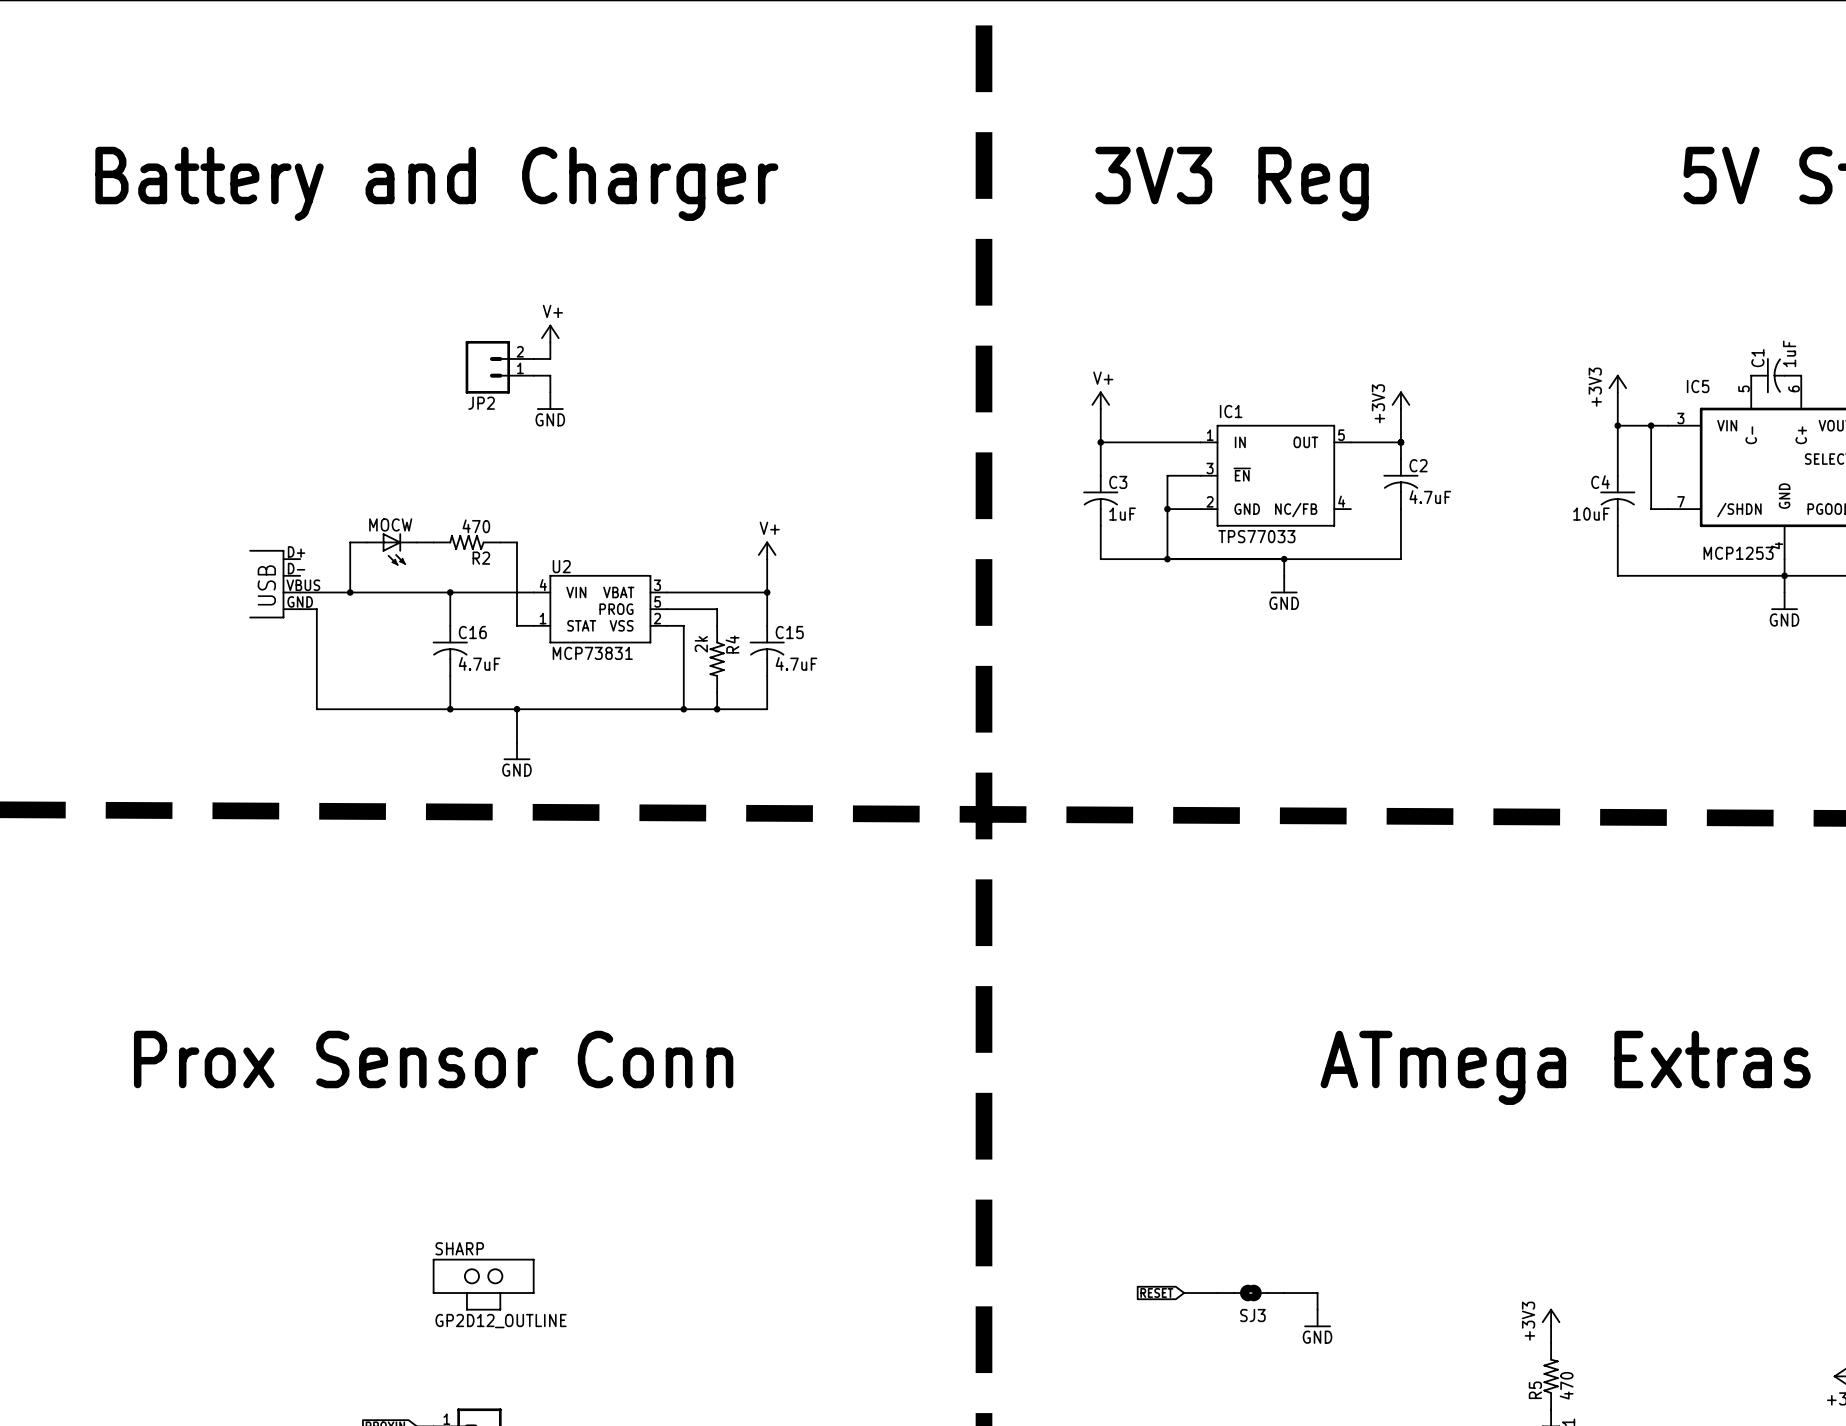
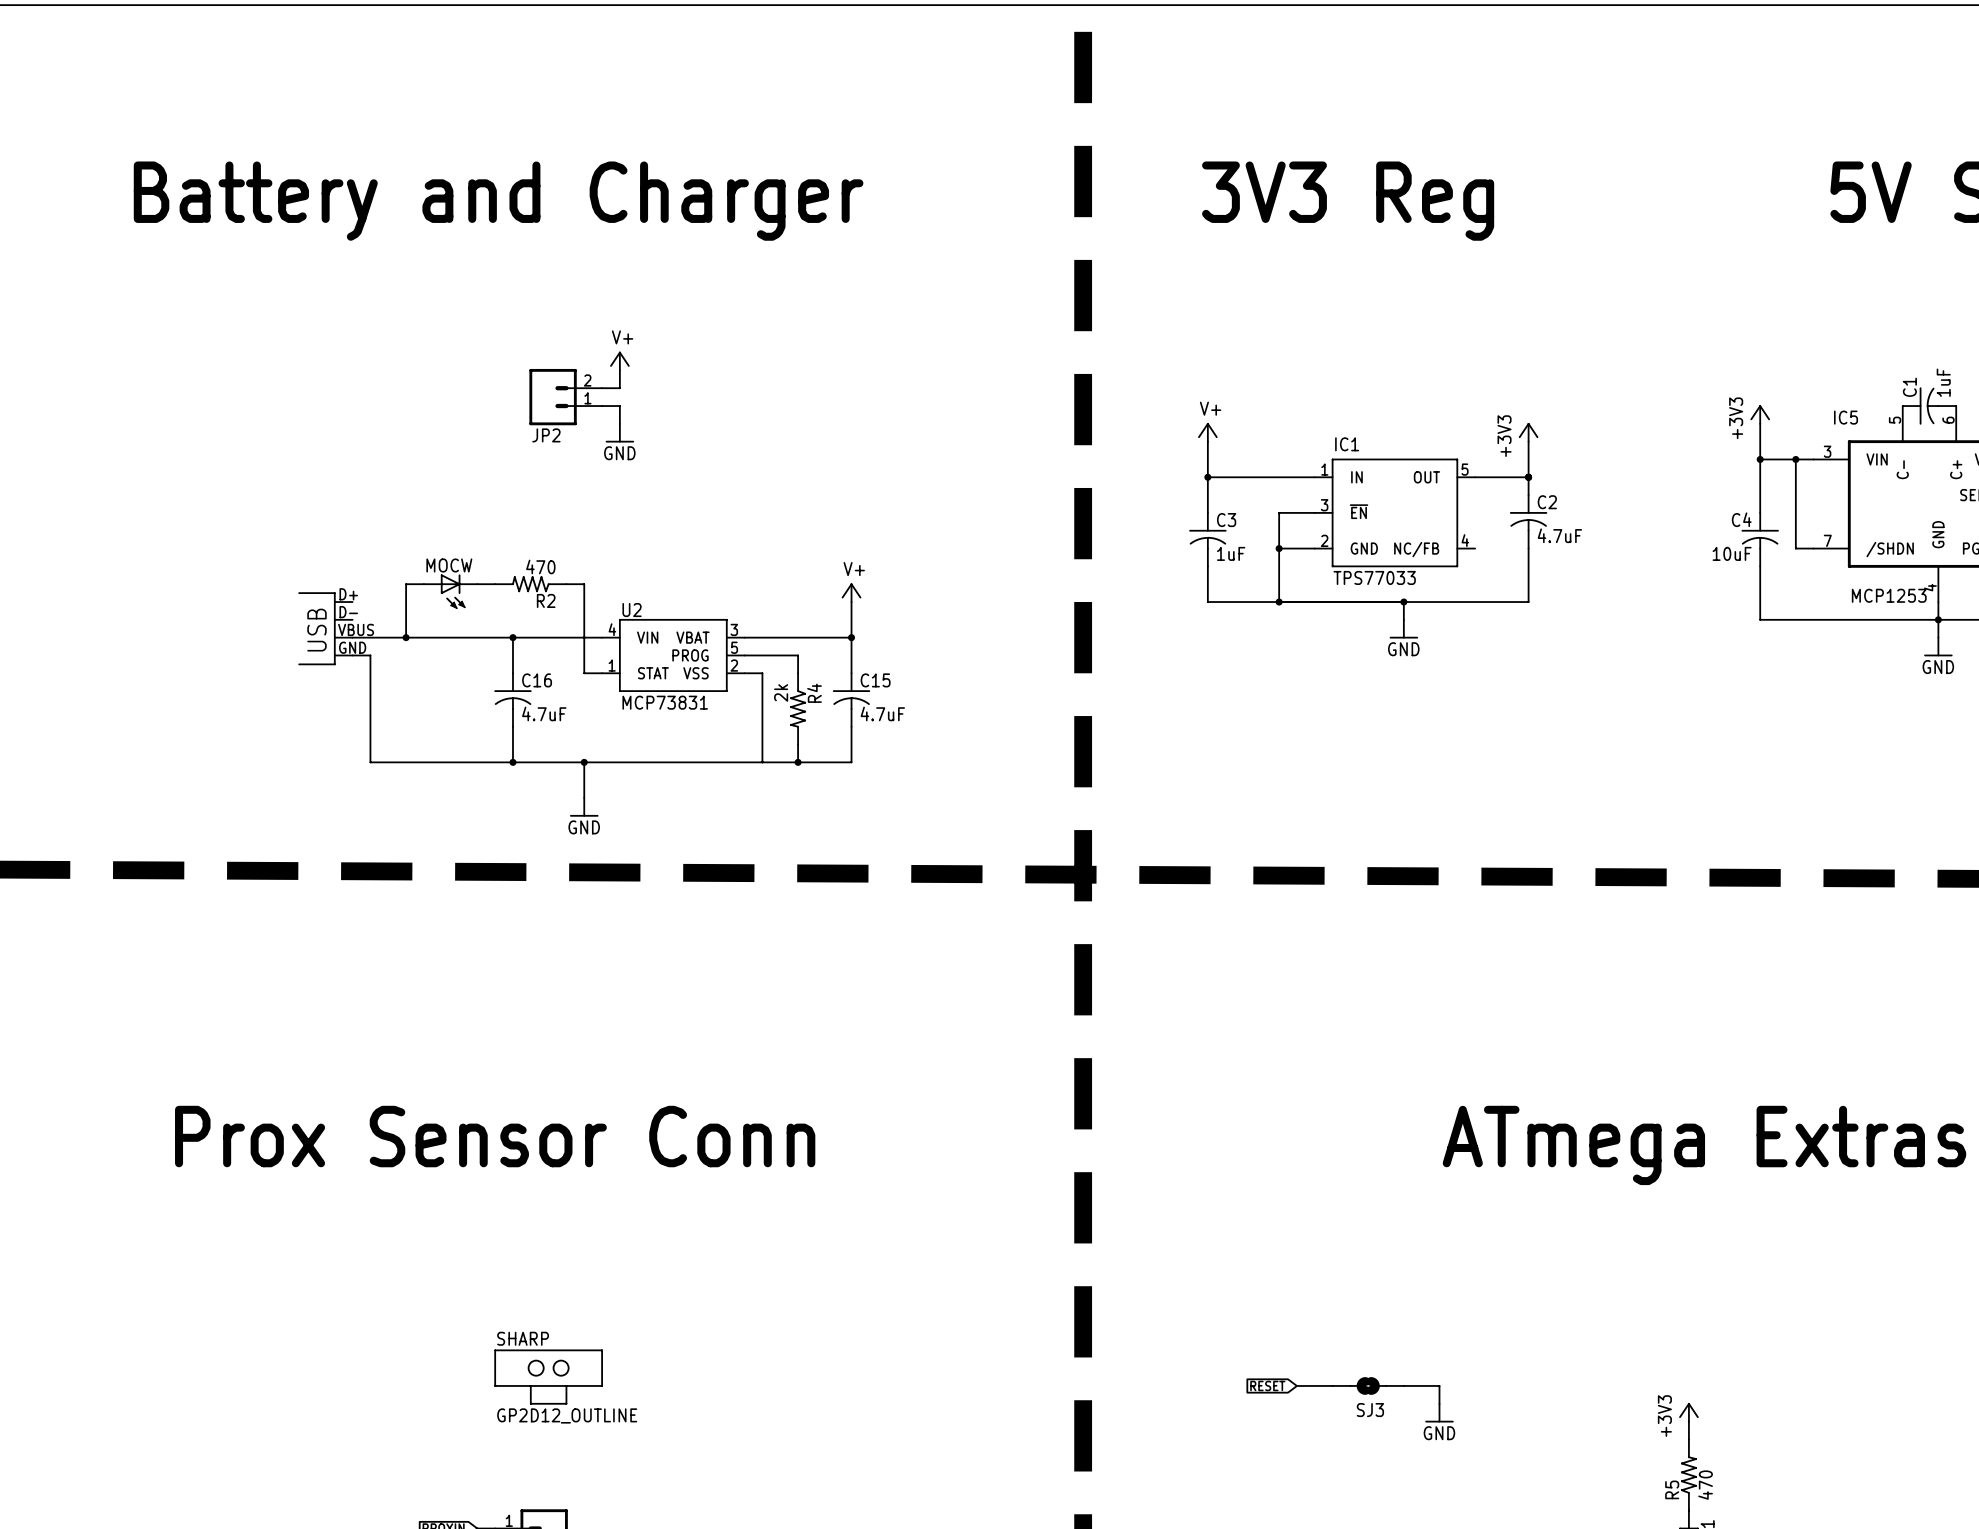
junction: (683, 709) -> none

